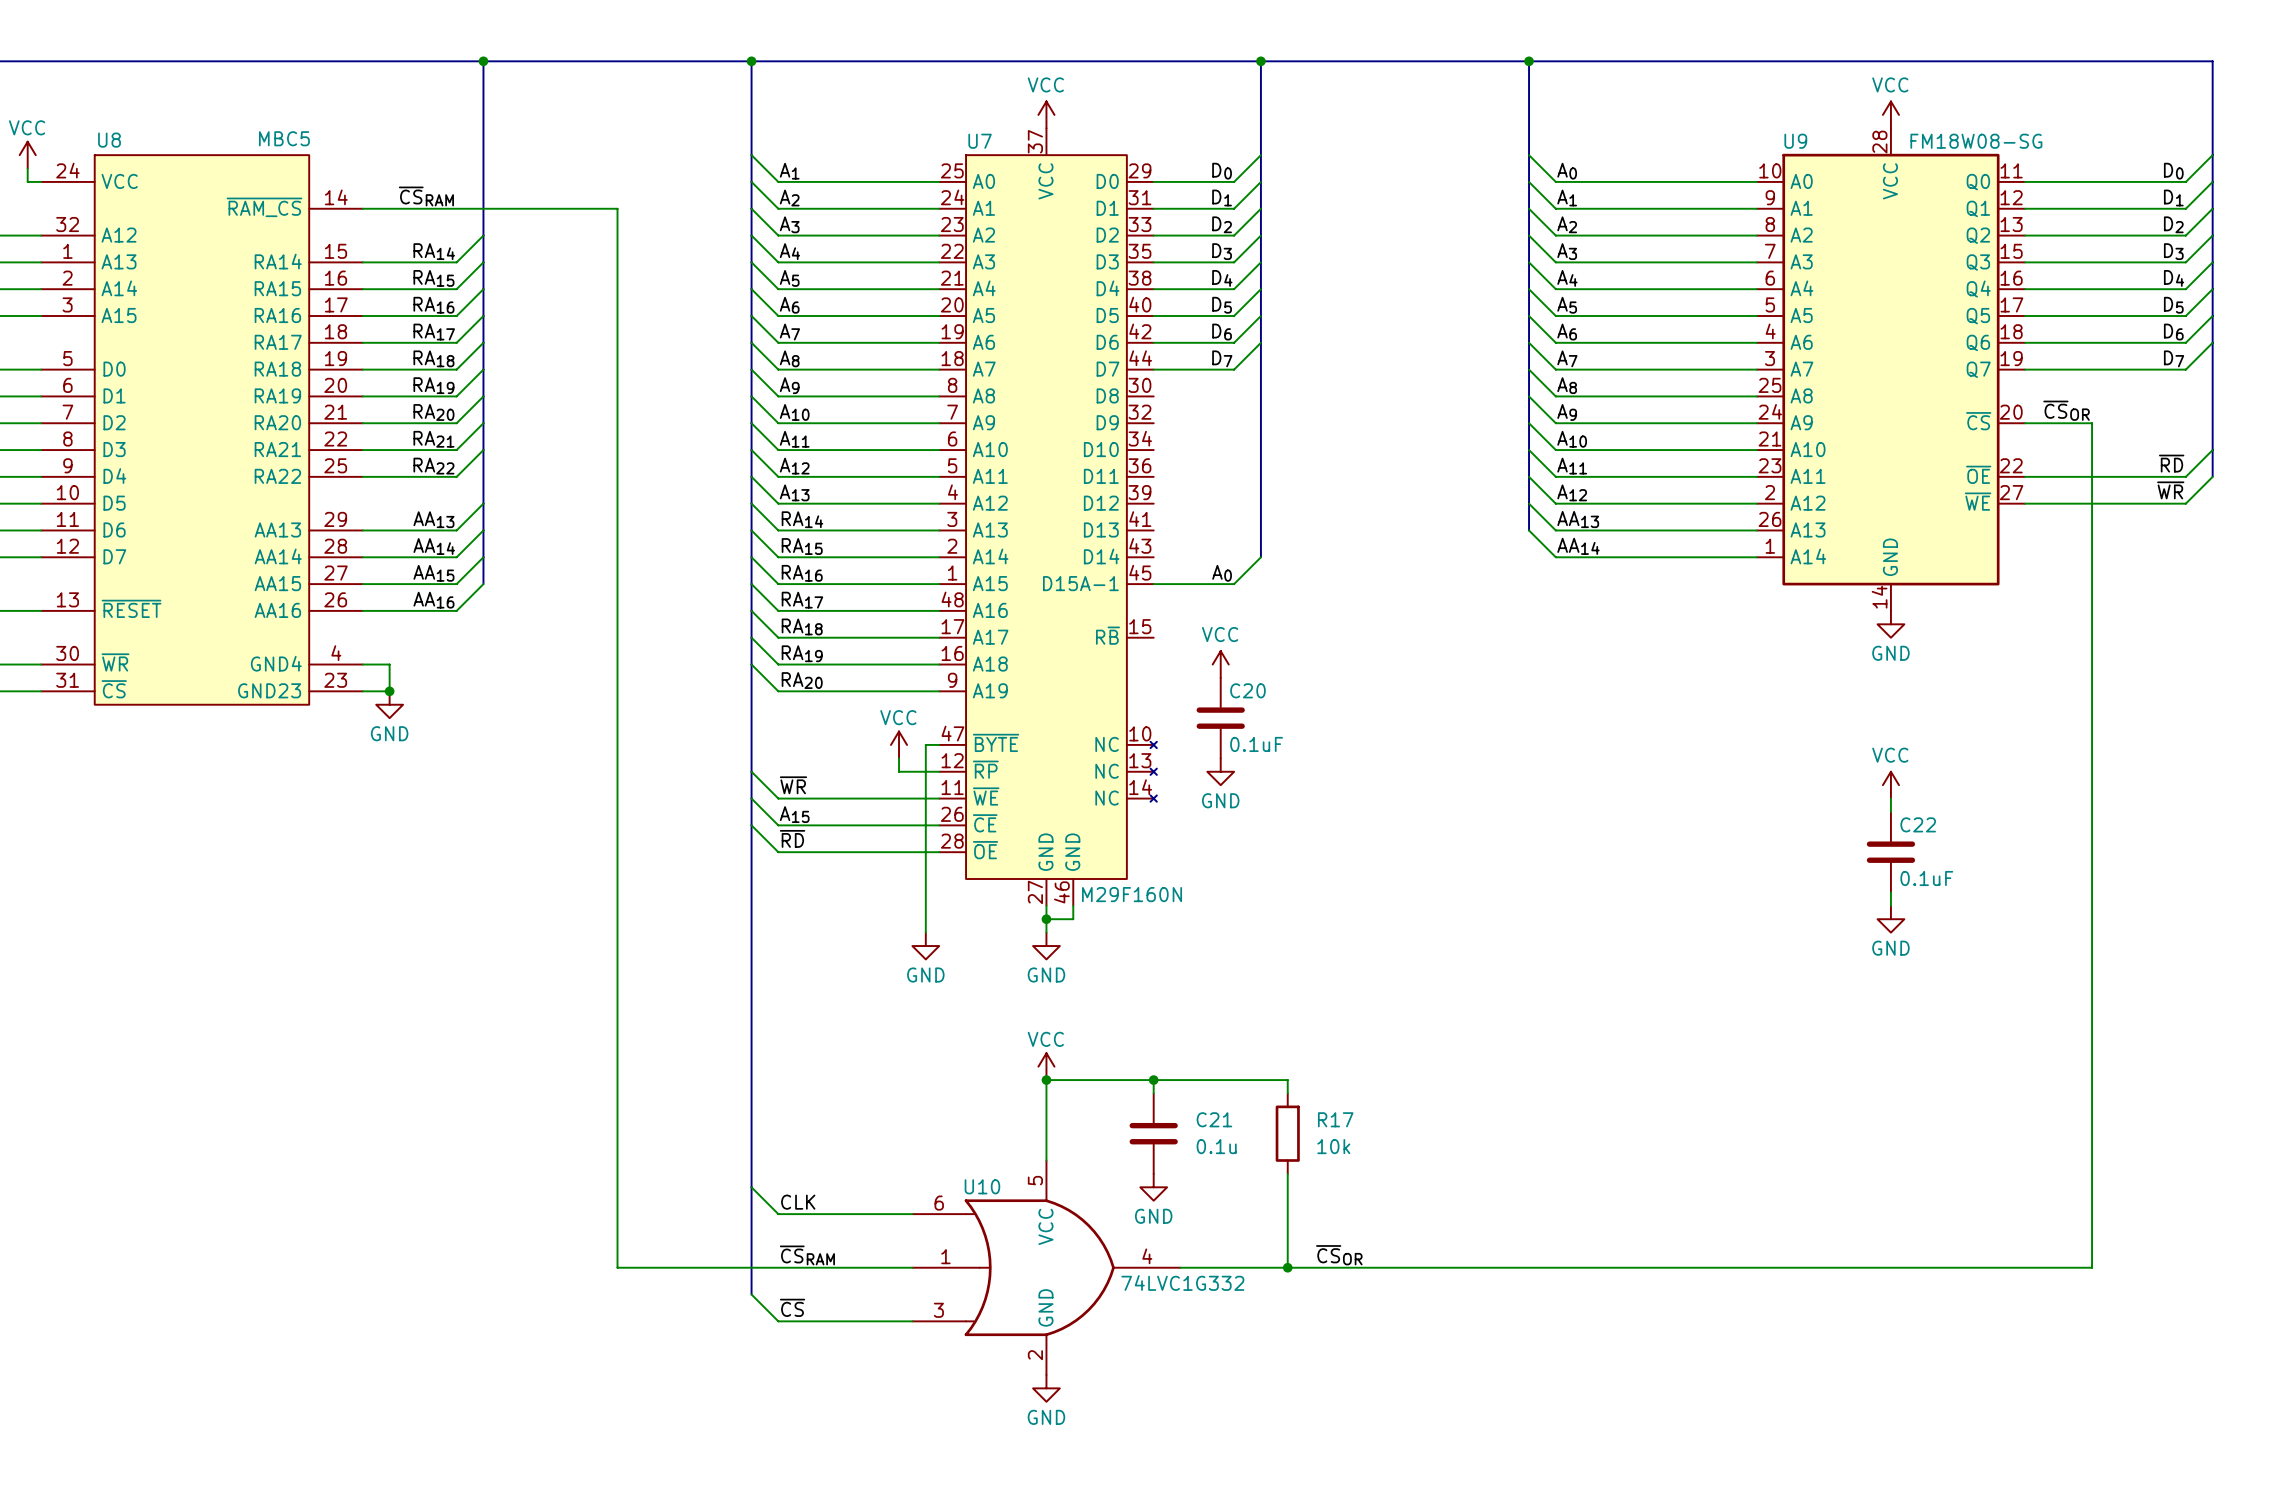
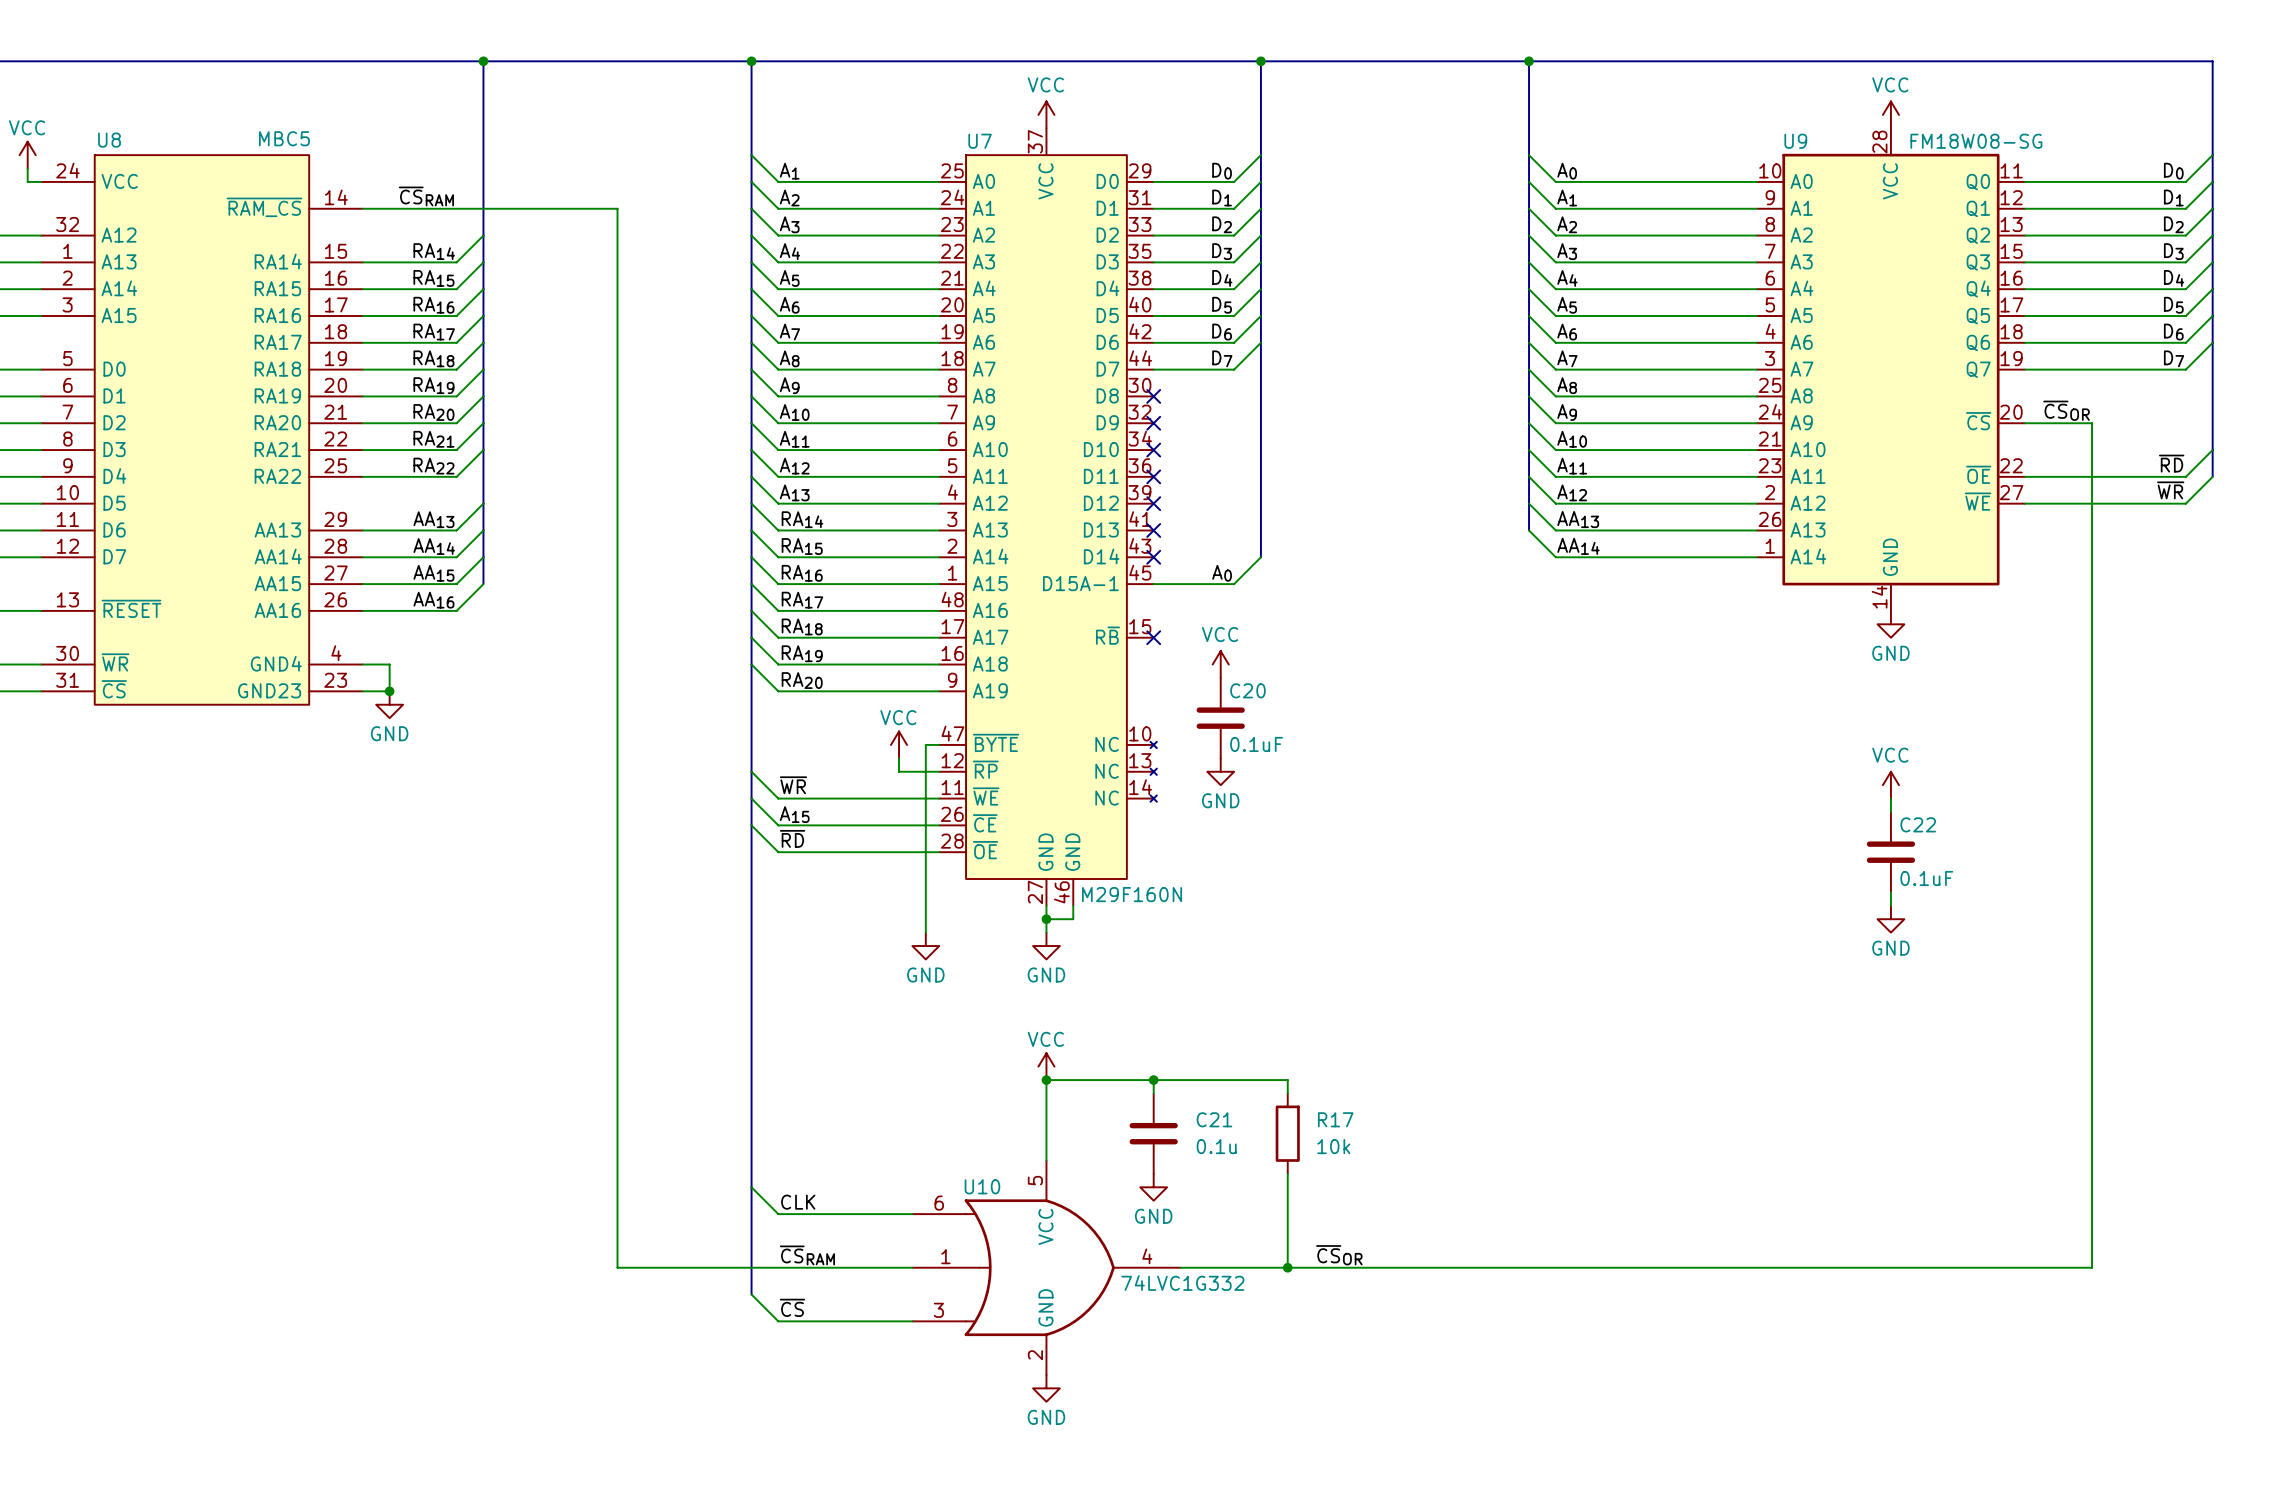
no-connect mark: none -> (1153, 396)
no-connect mark: none -> (1153, 423)
no-connect mark: none -> (1153, 450)
no-connect mark: none -> (1153, 476)
no-connect mark: none -> (1153, 503)
no-connect mark: none -> (1153, 530)
no-connect mark: none -> (1153, 557)
no-connect mark: none -> (1153, 637)

